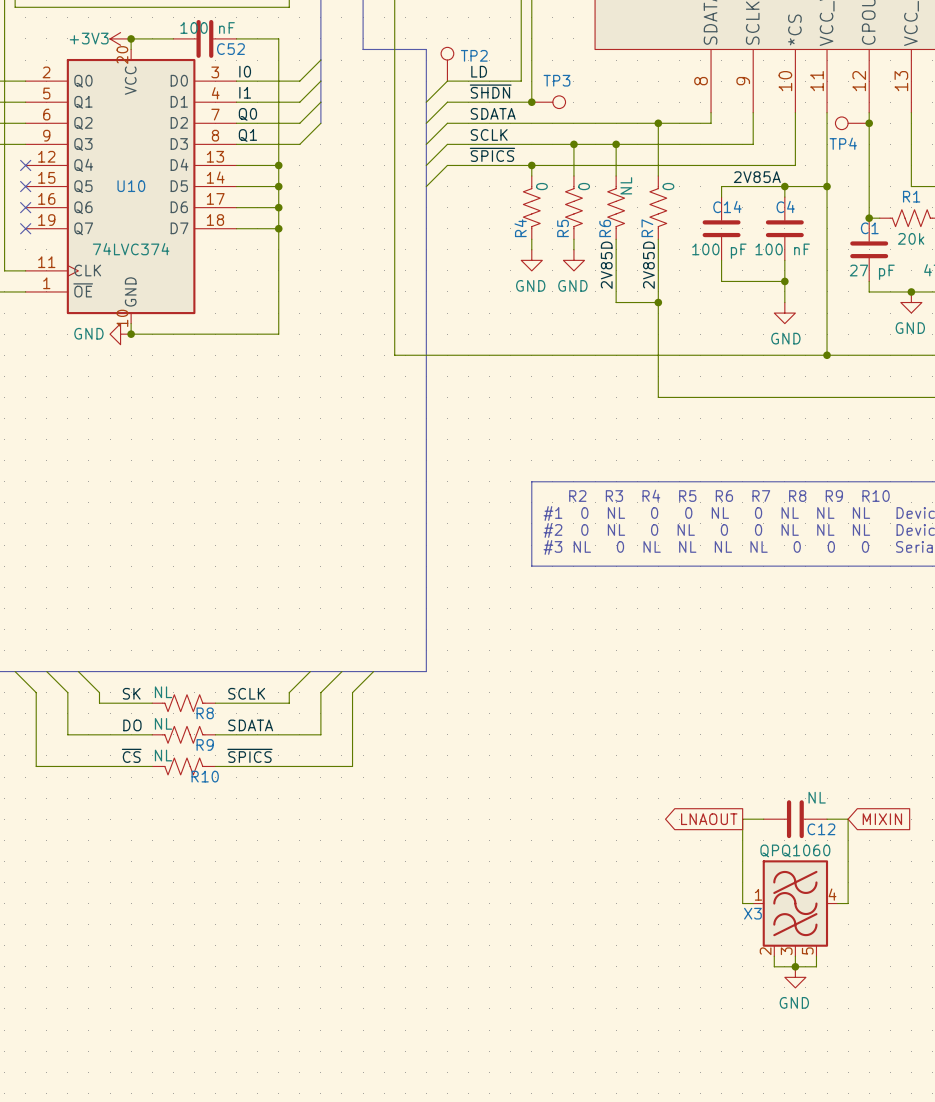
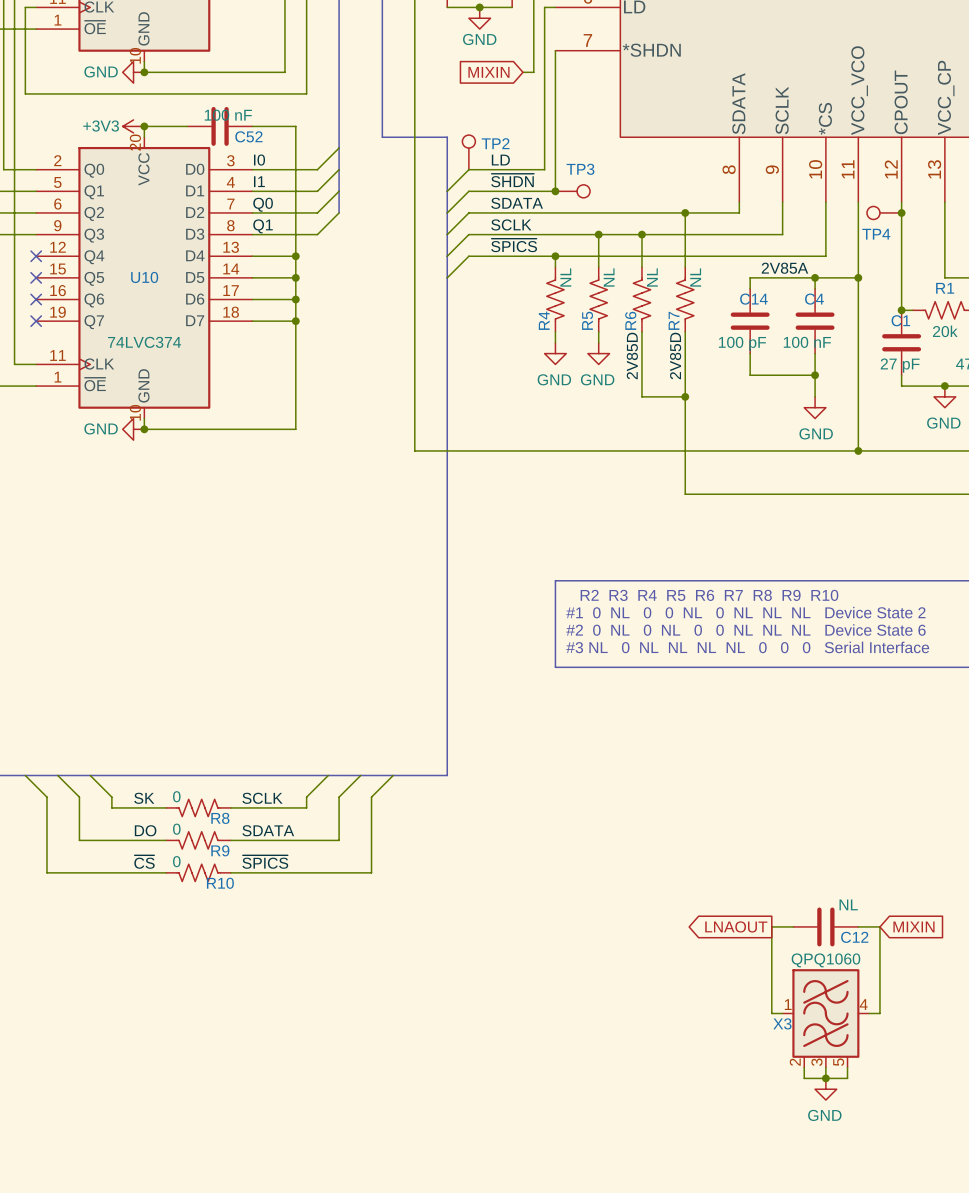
R4 value: 0 (541, 186) -> NL (565, 277)
R5 value: 0 (584, 186) -> NL (609, 277)
R7 value: 0 (668, 186) -> NL (695, 277)
R8 value: NL (163, 692) -> 0 (176, 796)
R9 value: NL (163, 723) -> 0 (176, 829)
R10 value: NL (163, 755) -> 0 (176, 861)

